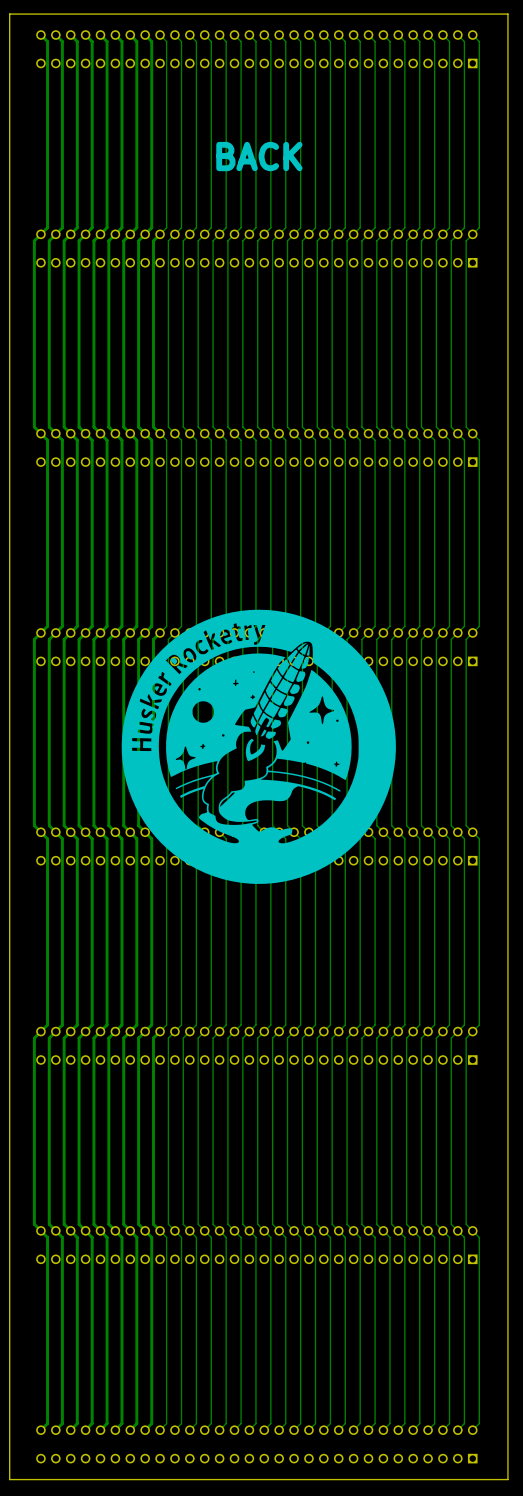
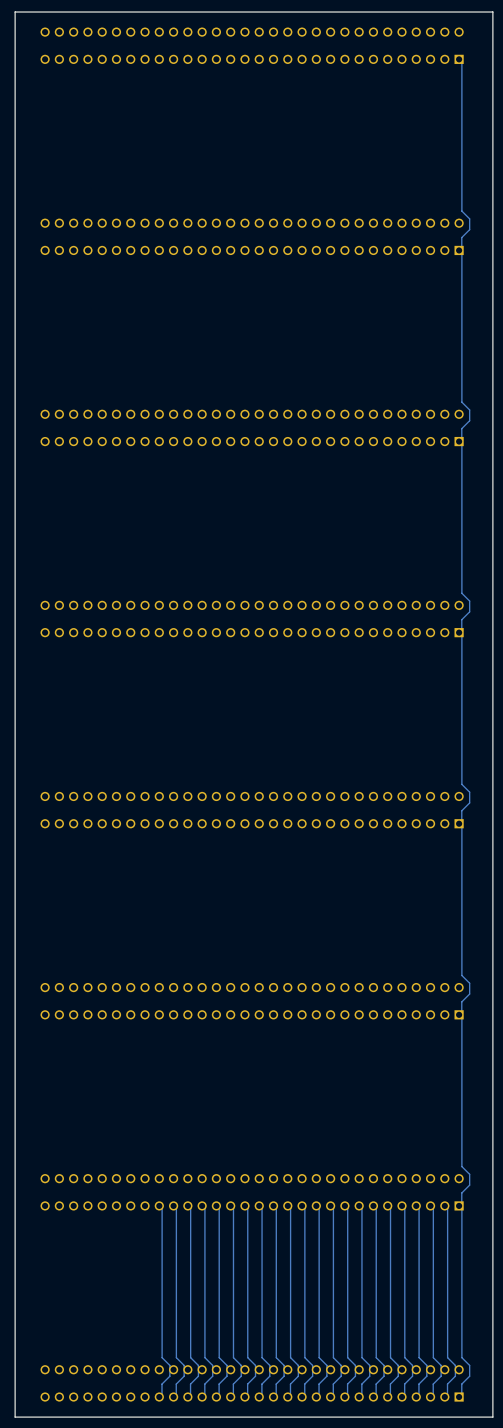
track: (40, 35) (47, 41) (47, 227) (34, 240) (34, 427) (47, 440) (47, 626) (34, 639) (34, 825) (47, 838) (47, 1024) (34, 1038) (34, 1224) (47, 1237) (47, 1423) (40, 1430) -> none
track: (55, 35) (62, 41) (62, 227) (49, 240) (49, 427) (62, 440) (62, 626) (49, 639) (49, 825) (62, 838) (62, 1024) (49, 1038) (49, 1224) (62, 1237) (62, 1423) (55, 1430) -> none
track: (70, 35) (77, 41) (77, 227) (64, 240) (64, 427) (77, 440) (77, 626) (64, 639) (64, 825) (77, 838) (77, 1024) (64, 1038) (64, 1224) (77, 1237) (77, 1423) (70, 1430) -> none
track: (85, 35) (92, 41) (92, 227) (79, 240) (79, 427) (92, 440) (92, 626) (79, 639) (79, 825) (92, 838) (92, 1024) (79, 1038) (79, 1224) (92, 1237) (92, 1423) (85, 1430) -> none
track: (100, 35) (107, 41) (107, 227) (93, 240) (93, 427) (107, 440) (107, 626) (93, 639) (93, 825) (107, 838) (107, 1024) (93, 1038) (93, 1224) (107, 1237) (107, 1423) (100, 1430) -> none
track: (115, 35) (121, 41) (121, 227) (108, 240) (108, 427) (121, 440) (121, 626) (108, 639) (108, 825) (121, 838) (121, 1024) (108, 1038) (108, 1224) (121, 1237) (121, 1423) (115, 1430) -> none
track: (130, 35) (136, 41) (136, 227) (123, 240) (123, 427) (136, 440) (136, 626) (123, 639) (123, 825) (136, 838) (136, 1024) (123, 1038) (123, 1224) (136, 1237) (136, 1423) (130, 1430) -> none
track: (145, 35) (151, 41) (151, 227) (138, 240) (138, 427) (151, 440) (151, 626) (138, 639) (138, 825) (151, 838) (151, 1024) (138, 1038) (138, 1224) (151, 1237) (151, 1423) (145, 1430) -> none
track: (160, 35) (166, 41) (166, 227) (153, 240) (153, 427) (166, 440) (166, 626) (153, 639) (153, 825) (166, 838) (166, 1024) (153, 1038) (153, 1224) (166, 1237) (166, 1423) (160, 1430) -> none
track: (174, 35) (181, 41) (181, 227) (168, 240) (168, 427) (181, 440) (181, 626) (168, 639) (168, 825) (181, 838) (181, 1024) (168, 1038) (168, 1224) (181, 1237) (181, 1423) (174, 1430) -> none
track: (189, 35) (196, 41) (196, 227) (183, 240) (183, 427) (196, 440) (196, 626) (183, 639) (183, 825) (196, 838) (196, 1024) (183, 1038) (183, 1224) (196, 1237) (196, 1423) (189, 1430) -> none
track: (204, 35) (211, 41) (211, 227) (198, 240) (198, 427) (211, 440) (211, 626) (198, 639) (198, 825) (211, 838) (211, 1024) (198, 1038) (198, 1224) (211, 1237) (211, 1423) (204, 1430) -> none
track: (219, 35) (226, 41) (226, 227) (213, 240) (213, 427) (226, 440) (226, 626) (213, 639) (213, 825) (226, 838) (226, 1024) (213, 1038) (213, 1224) (226, 1237) (226, 1423) (219, 1430) -> none
track: (234, 35) (241, 41) (241, 227) (227, 240) (227, 427) (241, 440) (241, 626) (227, 639) (227, 825) (241, 838) (241, 1024) (227, 1038) (227, 1224) (241, 1237) (241, 1423) (234, 1430) -> none
track: (249, 35) (255, 41) (255, 227) (242, 240) (242, 427) (255, 440) (255, 626) (242, 639) (242, 825) (255, 838) (255, 1024) (242, 1038) (242, 1224) (255, 1237) (255, 1423) (249, 1430) -> none
track: (264, 35) (270, 41) (270, 227) (257, 240) (257, 427) (270, 440) (270, 626) (257, 639) (257, 825) (270, 838) (270, 1024) (257, 1038) (257, 1224) (270, 1237) (270, 1423) (264, 1430) -> none
track: (279, 35) (285, 41) (285, 227) (272, 240) (272, 427) (285, 440) (285, 626) (272, 639) (272, 825) (285, 838) (285, 1024) (272, 1038) (272, 1224) (285, 1237) (285, 1423) (279, 1430) -> none
track: (294, 35) (300, 41) (300, 227) (287, 240) (287, 427) (300, 440) (300, 626) (287, 639) (287, 825) (300, 838) (300, 1024) (287, 1038) (287, 1224) (300, 1237) (300, 1423) (294, 1430) -> none
track: (308, 35) (315, 41) (315, 227) (302, 240) (302, 427) (315, 440) (315, 626) (302, 639) (302, 825) (315, 838) (315, 1024) (302, 1038) (302, 1224) (315, 1237) (315, 1423) (308, 1430) -> none
track: (323, 35) (330, 41) (330, 227) (317, 240) (317, 427) (330, 440) (330, 626) (317, 639) (317, 825) (330, 838) (330, 1024) (317, 1038) (317, 1224) (330, 1237) (330, 1423) (323, 1430) -> none
track: (338, 35) (345, 41) (345, 227) (332, 240) (332, 427) (345, 440) (345, 626) (332, 639) (332, 825) (345, 838) (345, 1024) (332, 1038) (332, 1224) (345, 1237) (345, 1423) (338, 1430) -> none
track: (353, 35) (360, 41) (360, 227) (347, 240) (347, 427) (360, 440) (360, 626) (347, 639) (347, 825) (360, 838) (360, 1024) (347, 1038) (347, 1224) (360, 1237) (360, 1423) (353, 1430) -> none
track: (368, 35) (375, 41) (375, 227) (361, 240) (361, 427) (375, 440) (375, 626) (361, 639) (361, 825) (375, 838) (375, 1024) (361, 1038) (361, 1224) (375, 1237) (375, 1423) (368, 1430) -> none
track: (383, 35) (389, 41) (389, 227) (376, 240) (376, 427) (389, 440) (389, 626) (376, 639) (376, 825) (389, 838) (389, 1024) (376, 1038) (376, 1224) (389, 1237) (389, 1423) (383, 1430) -> none
track: (398, 35) (404, 41) (404, 227) (391, 240) (391, 427) (404, 440) (404, 626) (391, 639) (391, 825) (404, 838) (404, 1024) (391, 1038) (391, 1224) (404, 1237) (404, 1423) (398, 1430) -> none
track: (413, 35) (419, 41) (419, 227) (406, 240) (406, 427) (419, 440) (419, 626) (406, 639) (406, 825) (419, 838) (419, 1024) (406, 1038) (406, 1224) (419, 1237) (419, 1423) (413, 1430) -> none
track: (428, 35) (434, 41) (434, 227) (421, 240) (421, 427) (434, 440) (434, 626) (421, 639) (421, 825) (434, 838) (434, 1024) (421, 1038) (421, 1224) (434, 1237) (434, 1423) (428, 1430) -> none
track: (442, 35) (449, 41) (449, 227) (436, 240) (436, 427) (449, 440) (449, 626) (436, 639) (436, 825) (449, 838) (449, 1024) (436, 1038) (436, 1224) (449, 1237) (449, 1423) (442, 1430) -> none
track: (457, 35) (464, 41) (464, 227) (451, 240) (451, 427) (464, 440) (464, 626) (451, 639) (451, 825) (464, 838) (464, 1024) (451, 1038) (451, 1224) (464, 1237) (464, 1423) (457, 1430) -> none
track: (472, 35) (479, 41) (479, 227) (466, 240) (466, 427) (479, 440) (479, 626) (466, 639) (466, 825) (479, 838) (479, 1024) (466, 1038) (466, 1224) (479, 1237) (479, 1423) (472, 1430) -> none
track: none -> (461, 59) (461, 211) (469, 218) (469, 229) (461, 237) (461, 402) (469, 409) (469, 420) (461, 428) (461, 441)
text: BACK (259, 156) -> none
track: none -> (461, 441) (461, 593) (469, 601) (469, 611) (461, 619) (461, 632)
drawing: [121, 609, 396, 884] -> none
track: none -> (461, 632) (461, 784) (469, 792) (469, 802) (461, 810) (461, 823)
track: none -> (461, 823) (461, 975) (469, 983) (469, 994) (461, 1001) (461, 1014)
track: none -> (461, 1014) (461, 1166) (469, 1174) (469, 1185) (461, 1193) (461, 1205)
track: none -> (162, 1206) (162, 1357) (169, 1365) (169, 1376) (161, 1384) (161, 1397)
track: none -> (176, 1206) (176, 1357) (184, 1365) (184, 1376) (176, 1384) (176, 1397)
track: none -> (190, 1206) (190, 1357) (198, 1365) (198, 1376) (190, 1384) (190, 1397)
track: none -> (204, 1206) (204, 1357) (212, 1365) (212, 1376) (204, 1384) (204, 1397)
track: none -> (219, 1206) (219, 1357) (226, 1365) (226, 1376) (219, 1384) (219, 1397)
track: none -> (233, 1206) (233, 1357) (241, 1365) (241, 1376) (233, 1384) (233, 1397)
track: none -> (247, 1206) (247, 1357) (255, 1365) (255, 1376) (247, 1384) (247, 1397)
track: none -> (262, 1206) (262, 1357) (269, 1365) (269, 1376) (261, 1384) (261, 1397)
track: none -> (276, 1206) (276, 1357) (284, 1365) (284, 1376) (276, 1384) (276, 1397)
track: none -> (290, 1206) (290, 1357) (298, 1365) (298, 1376) (290, 1384) (290, 1397)
track: none -> (304, 1206) (304, 1357) (312, 1365) (312, 1376) (304, 1384) (304, 1397)
track: none -> (319, 1206) (319, 1357) (326, 1365) (326, 1376) (319, 1384) (319, 1397)
track: none -> (333, 1206) (333, 1357) (341, 1365) (341, 1376) (333, 1384) (333, 1397)
track: none -> (347, 1206) (347, 1357) (355, 1365) (355, 1376) (347, 1384) (347, 1397)
track: none -> (361, 1206) (361, 1357) (369, 1365) (369, 1376) (361, 1384) (361, 1397)
track: none -> (376, 1206) (376, 1357) (384, 1365) (384, 1376) (376, 1384) (376, 1397)
track: none -> (390, 1206) (390, 1357) (398, 1365) (398, 1376) (390, 1384) (390, 1397)
track: none -> (404, 1206) (404, 1357) (412, 1365) (412, 1376) (404, 1384) (404, 1397)
track: none -> (419, 1206) (419, 1357) (426, 1365) (426, 1376) (418, 1384) (418, 1397)
track: none -> (433, 1206) (433, 1357) (441, 1365) (441, 1376) (433, 1384) (433, 1397)
track: none -> (447, 1206) (447, 1357) (455, 1365) (455, 1376) (447, 1384) (447, 1397)
track: none -> (461, 1206) (461, 1357) (469, 1365) (469, 1376) (461, 1384) (461, 1397)

